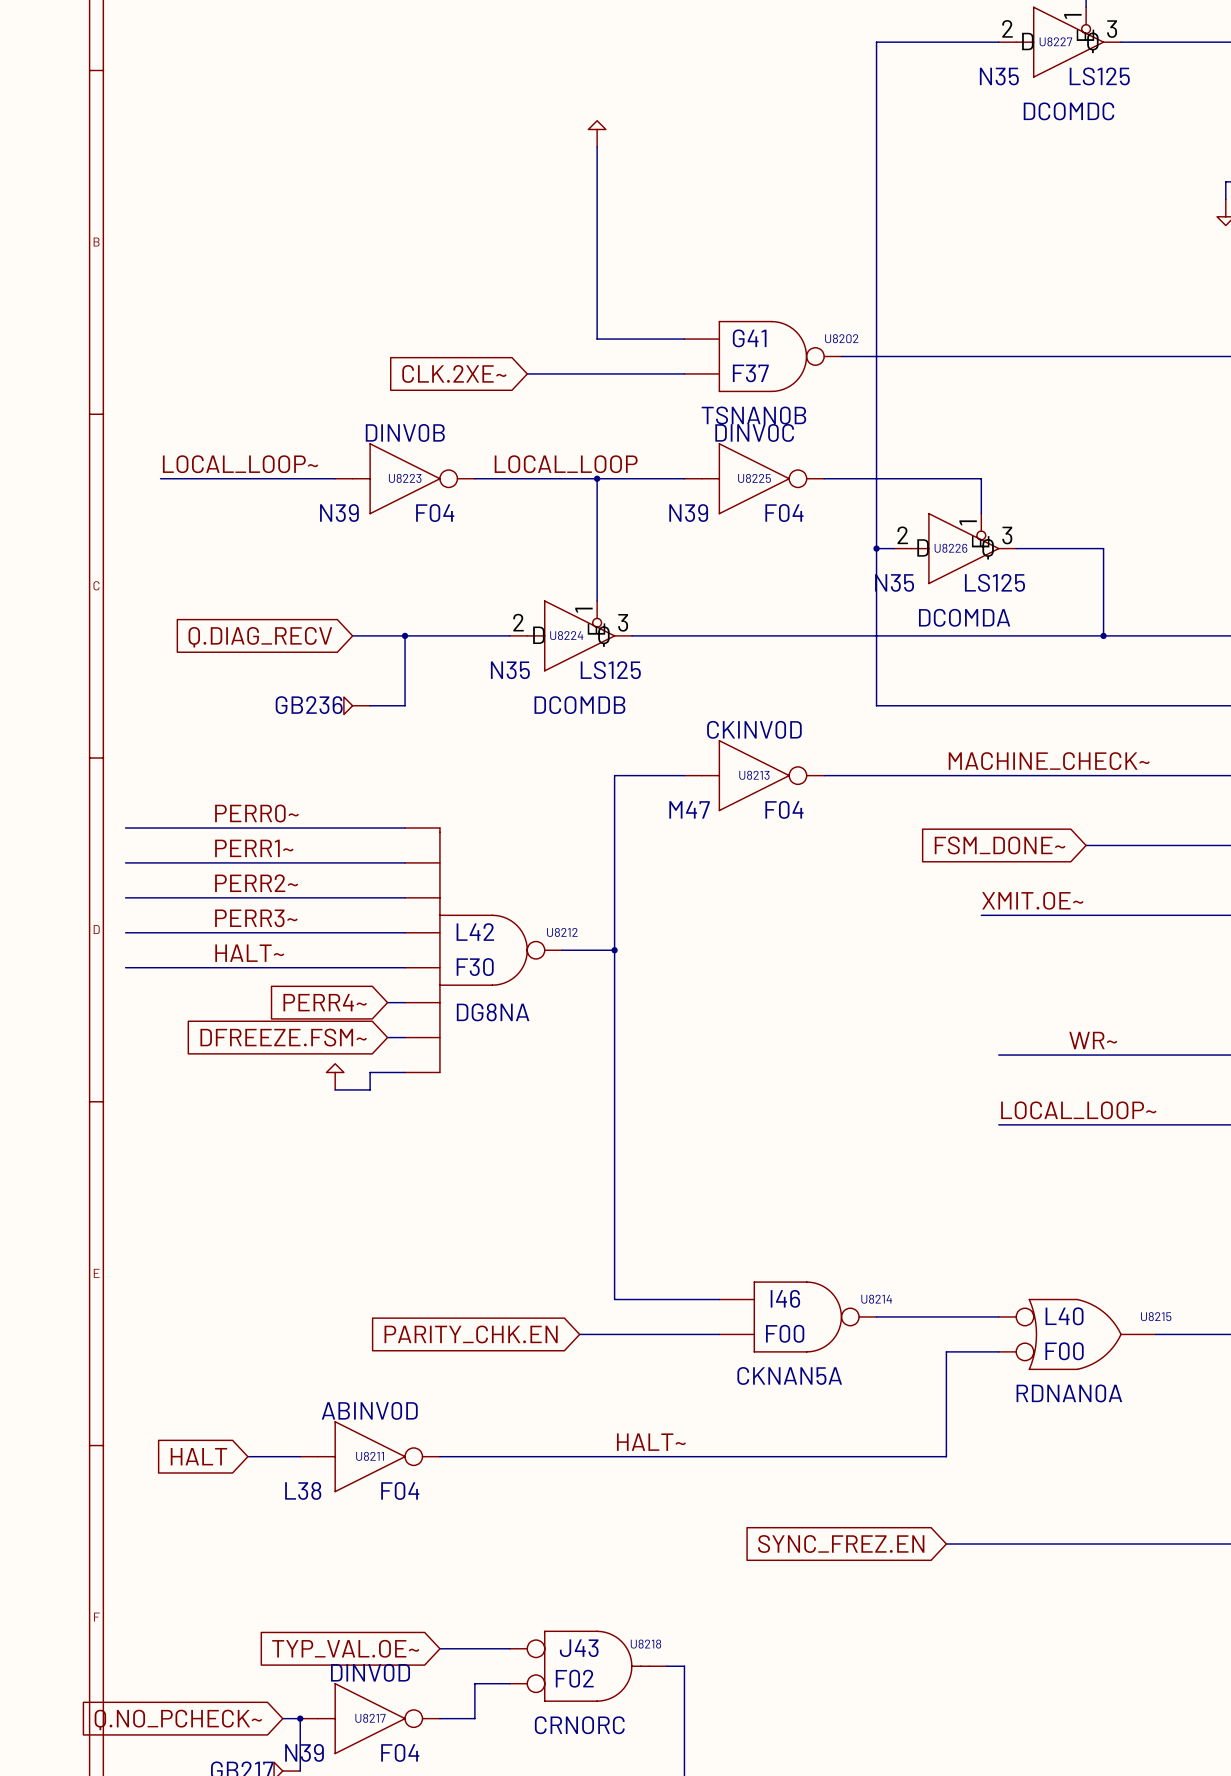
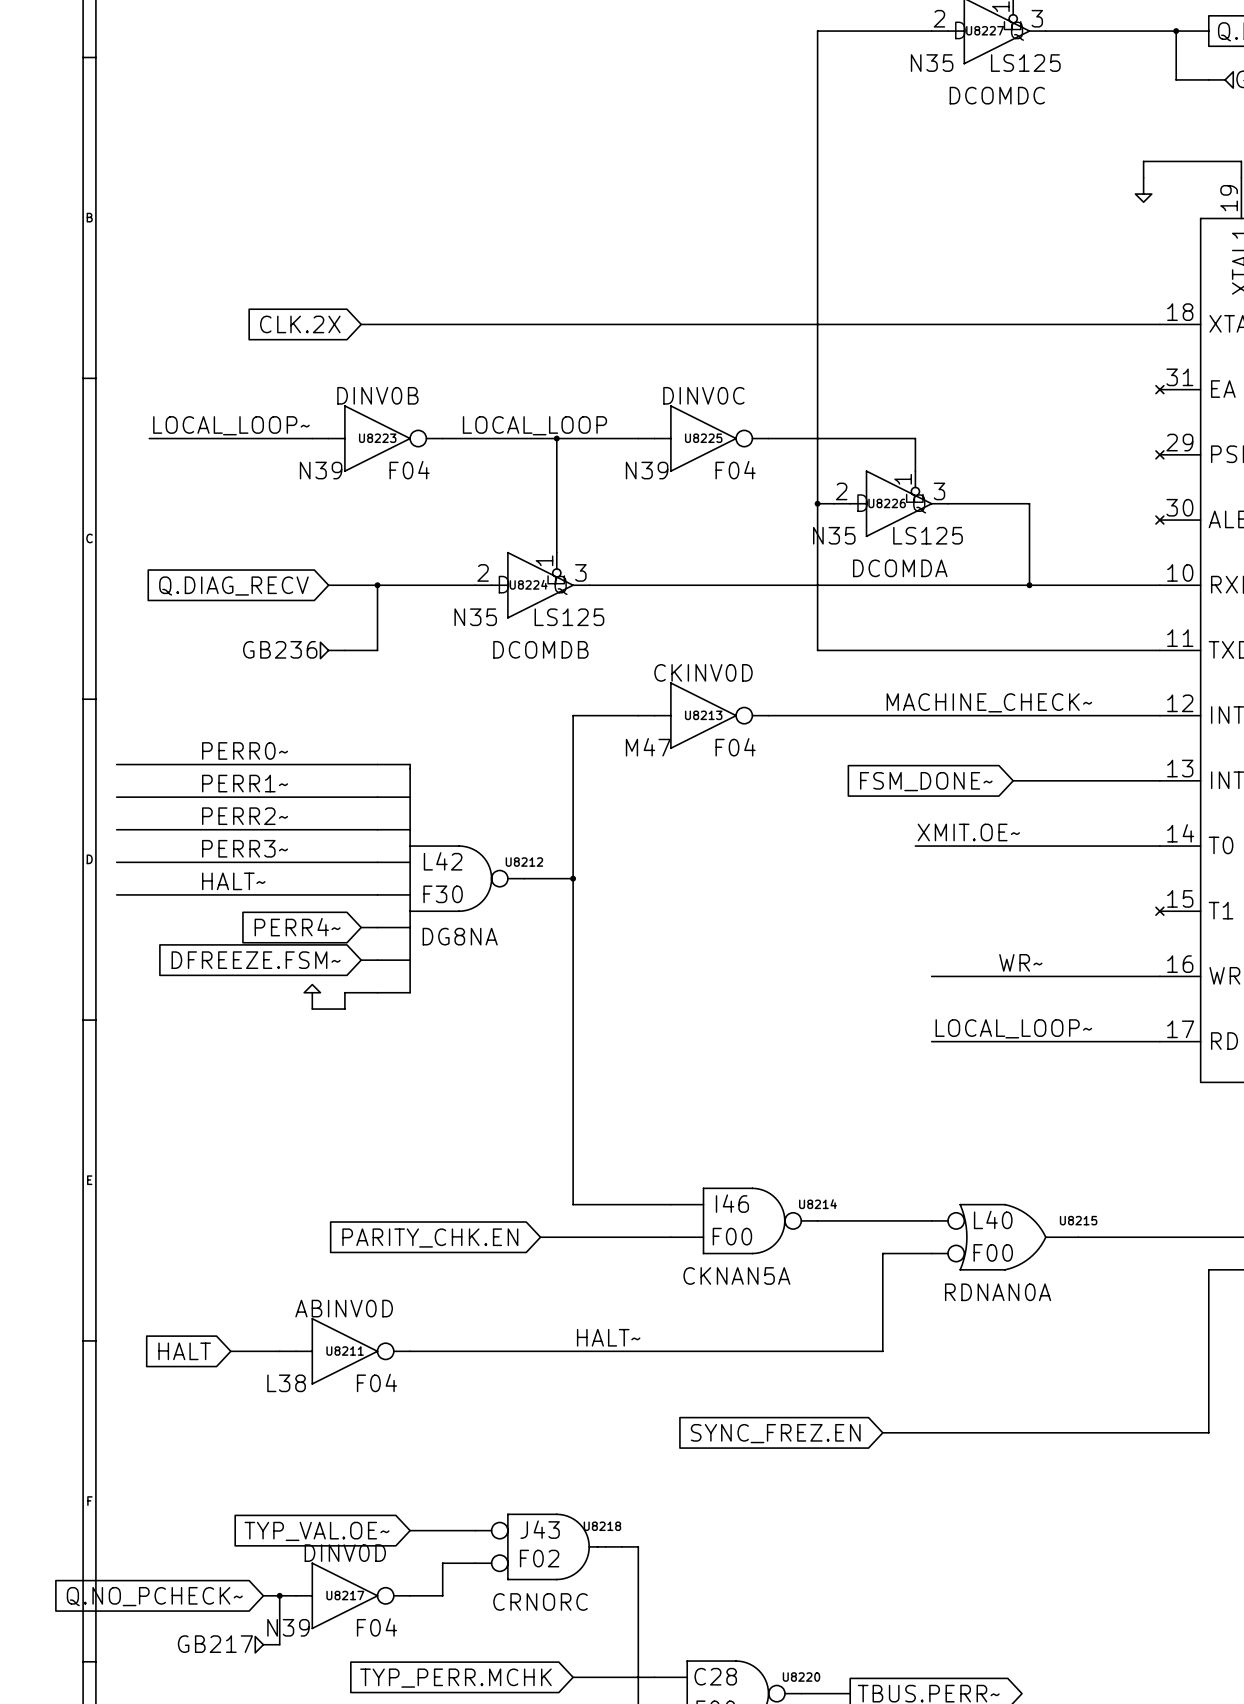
power symbol: (597, 133) -> none
wire: (597, 146) (597, 339) (684, 339) -> none
wire: none -> (361, 324) (785, 324)
U8202: F37 (763, 356) -> none
global label: CLK.2XE~ (454, 373) -> CLK.2X (300, 324)
wire: (527, 373) (684, 373) -> none

